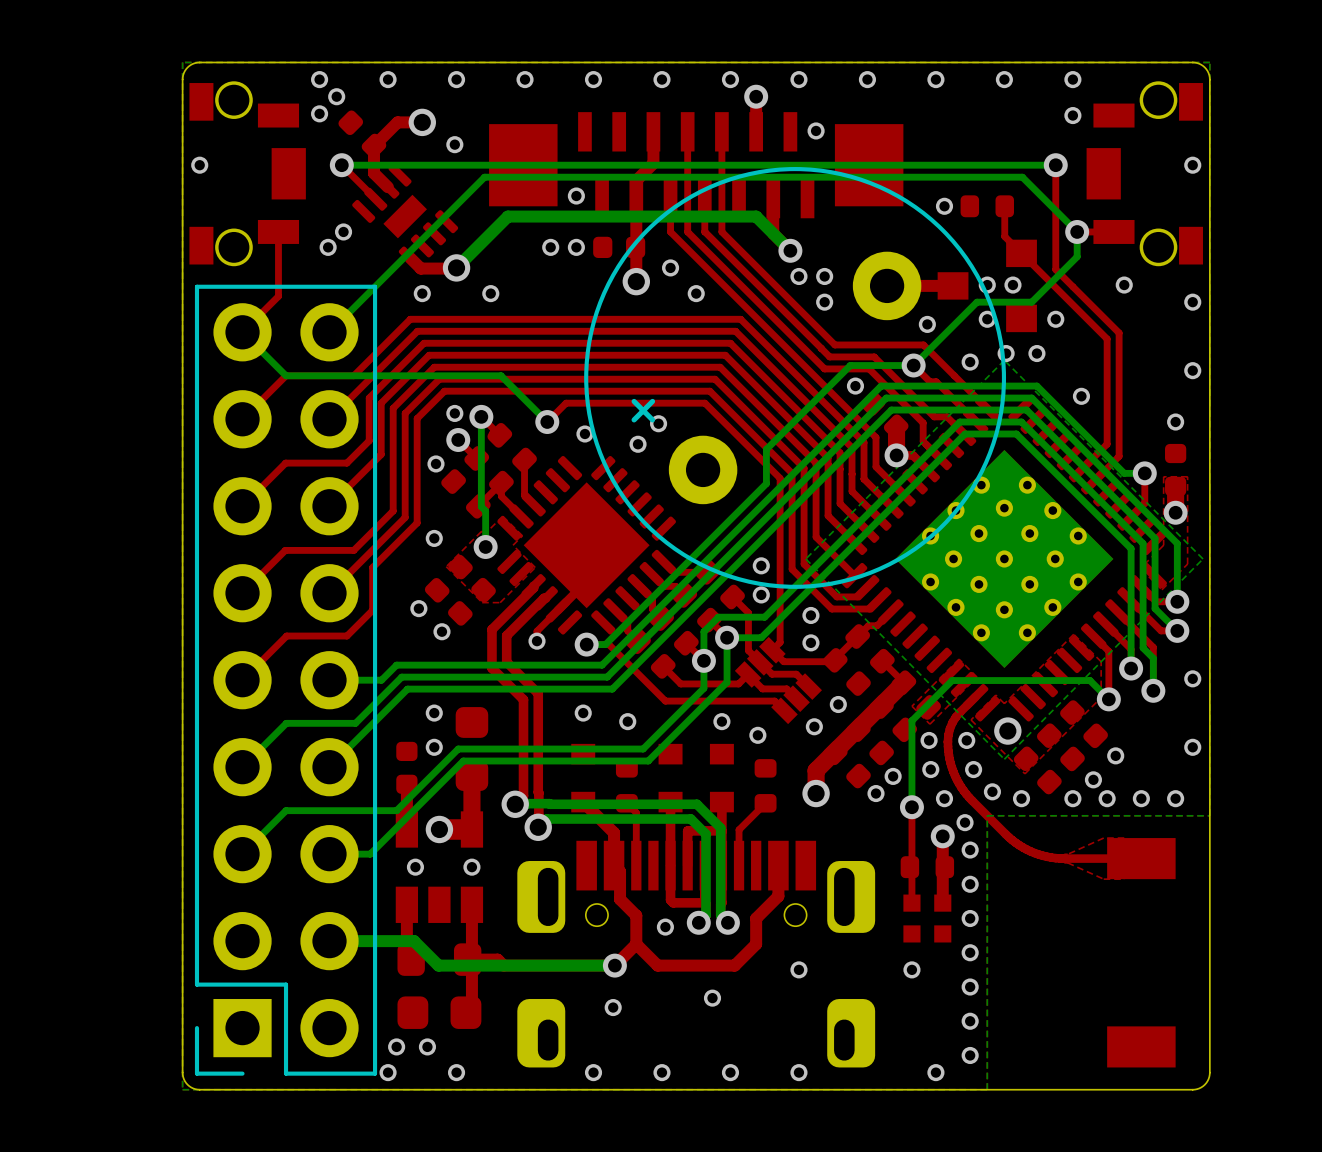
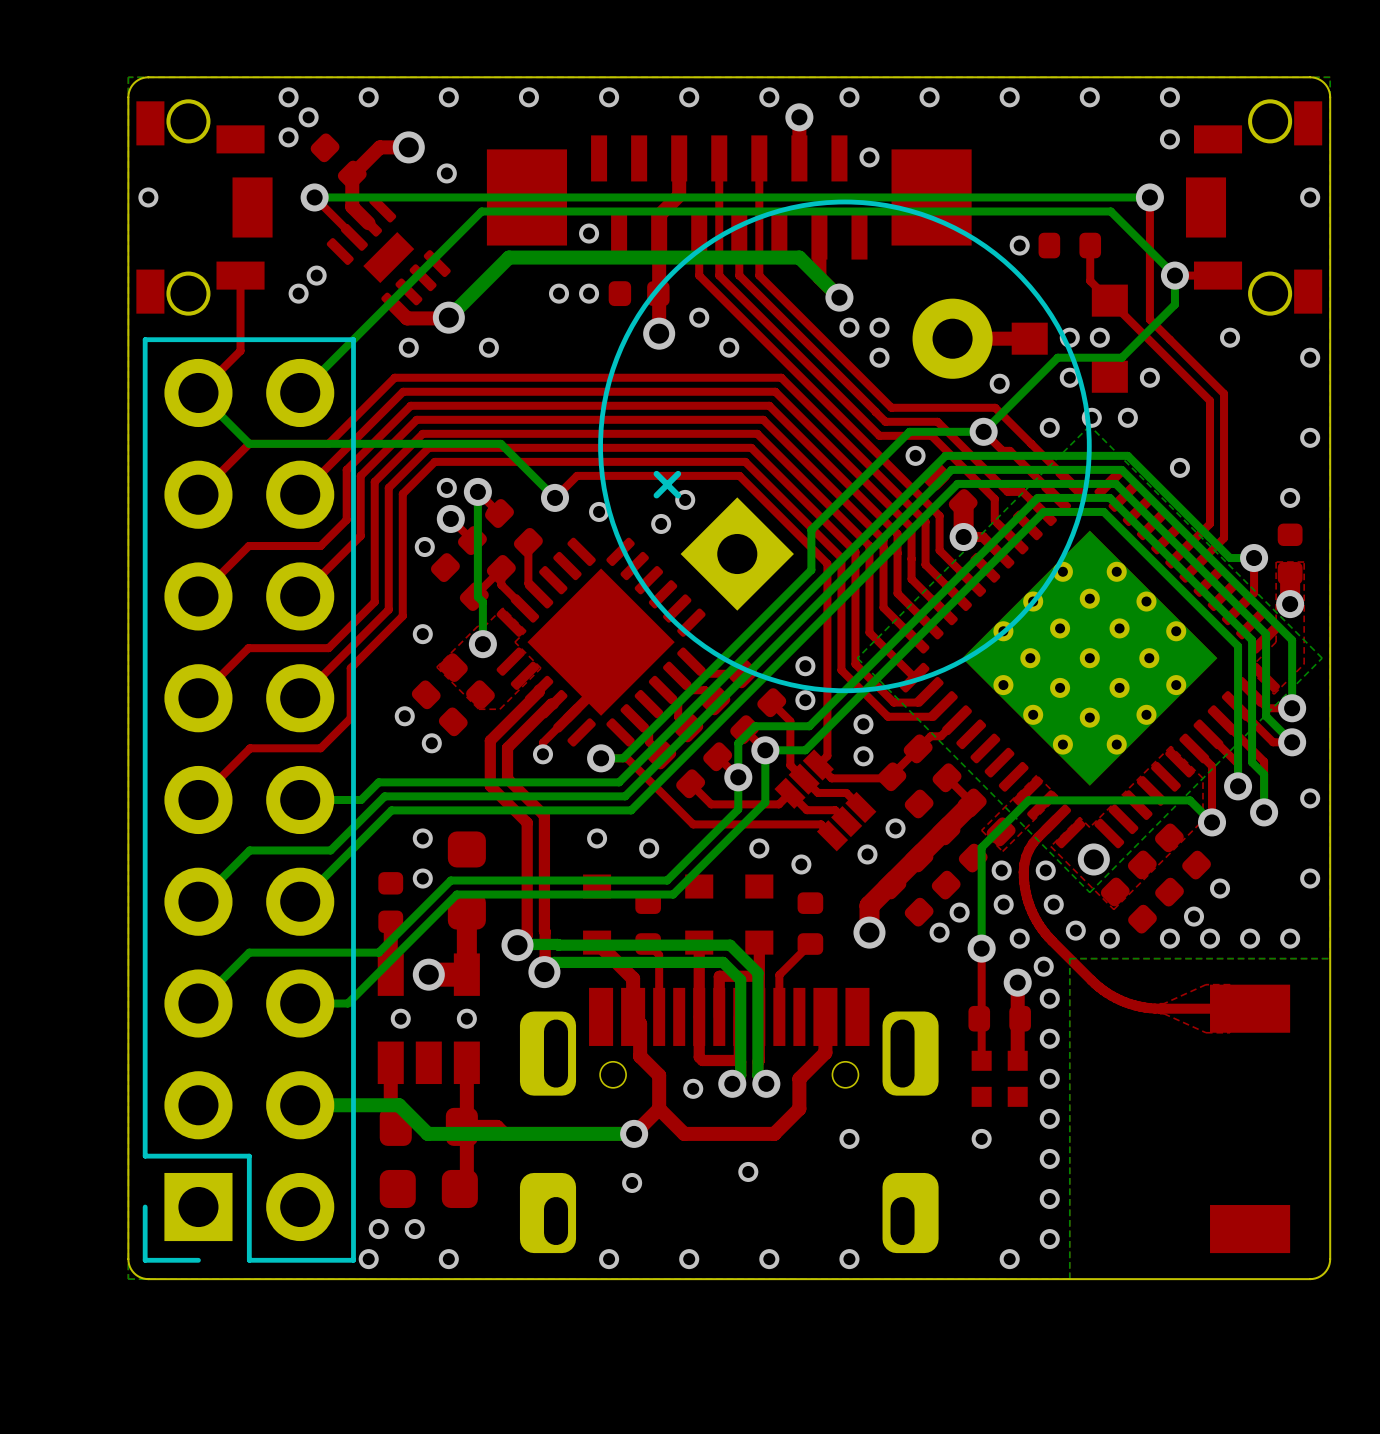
part footprint: [584, 167, 1007, 589] -> [598, 199, 1092, 694]

